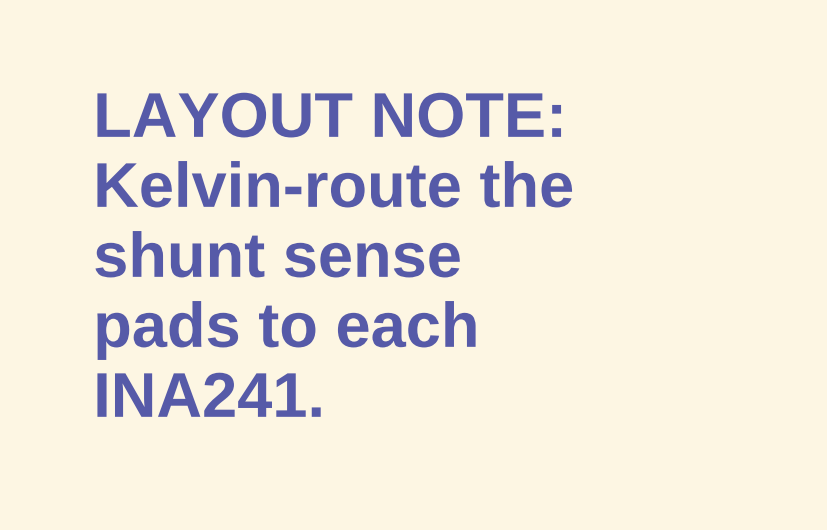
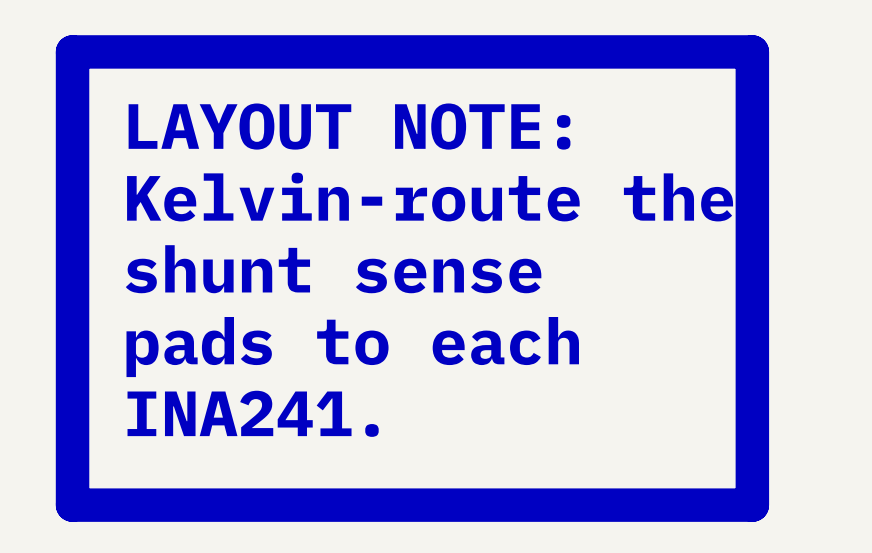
line: none -> (72, 51) (752, 51) (752, 505) (72, 505) (72, 51)

